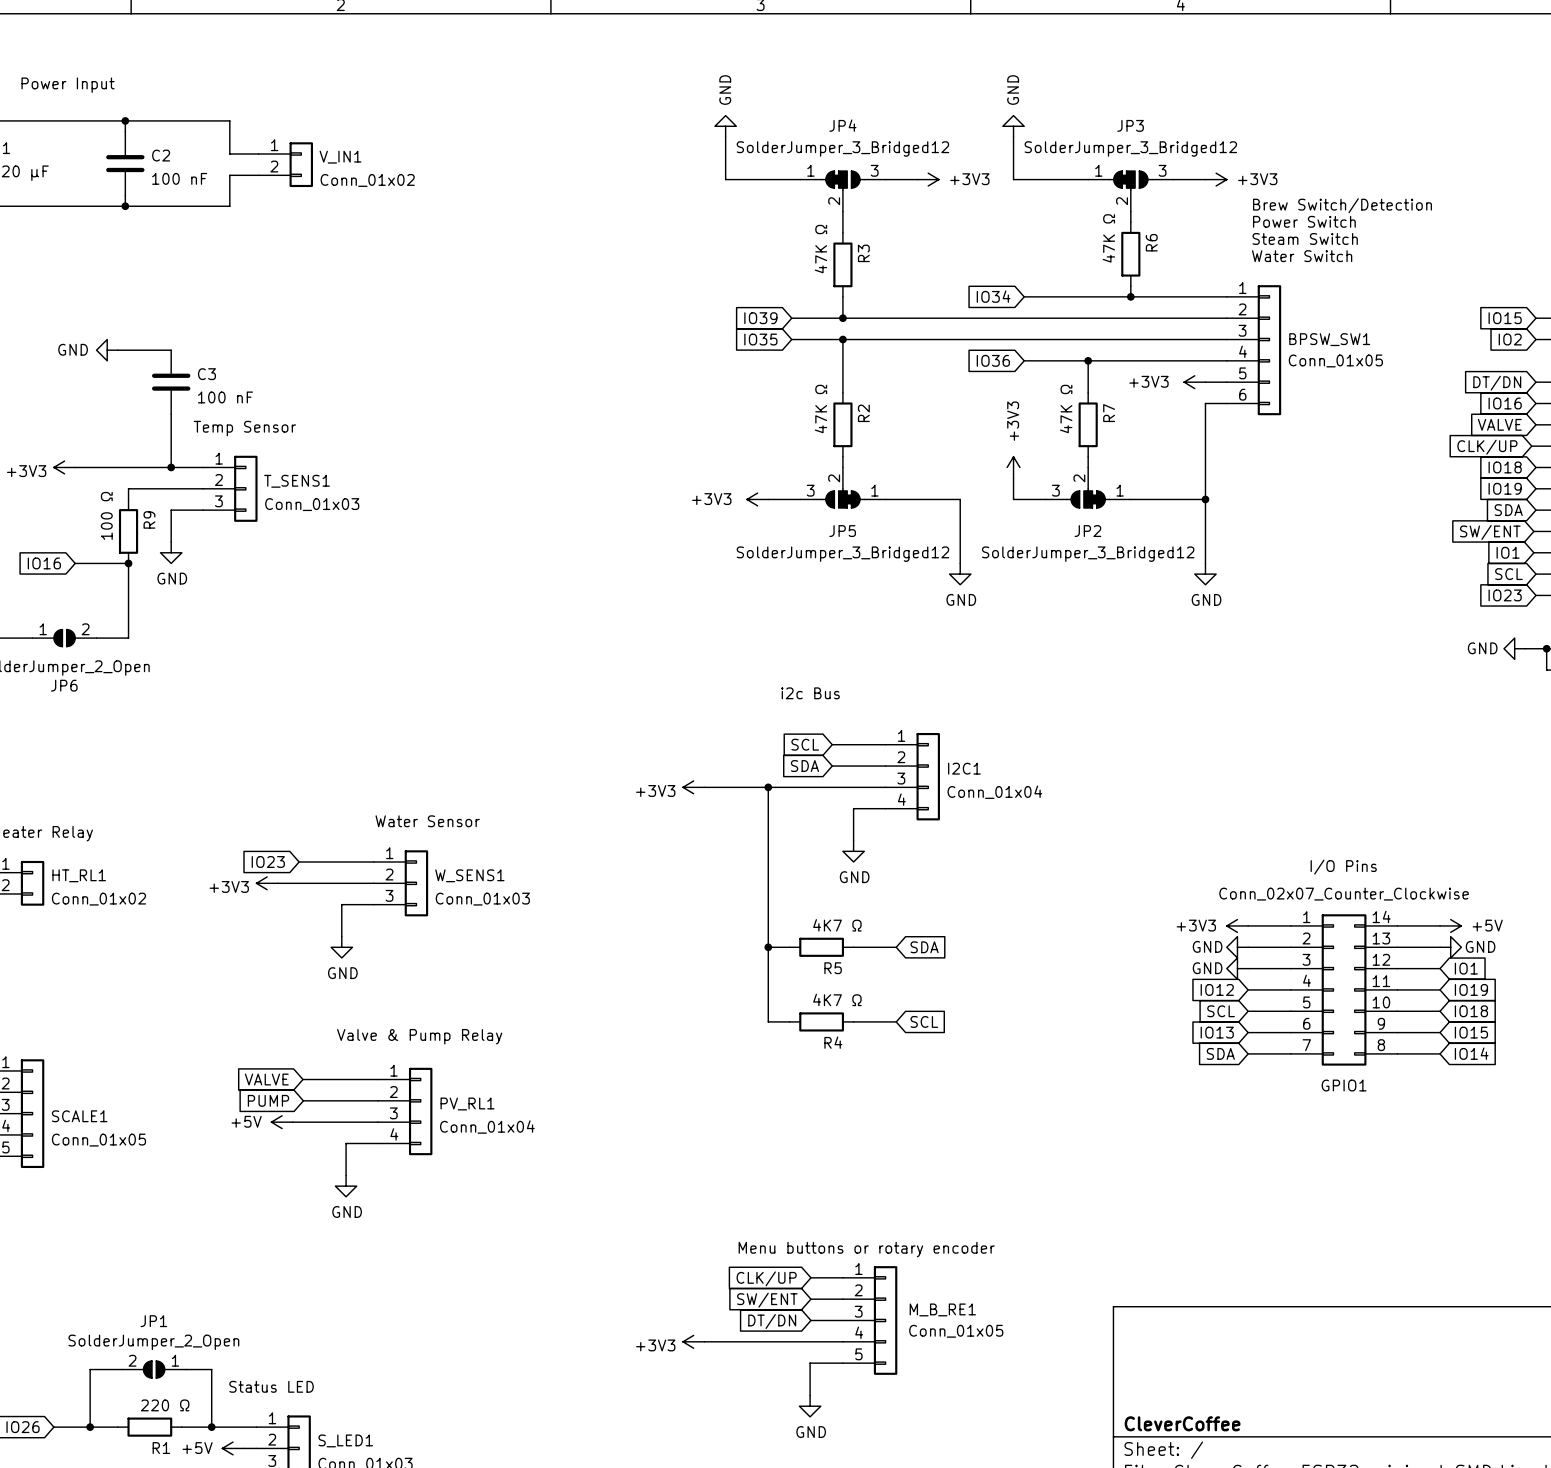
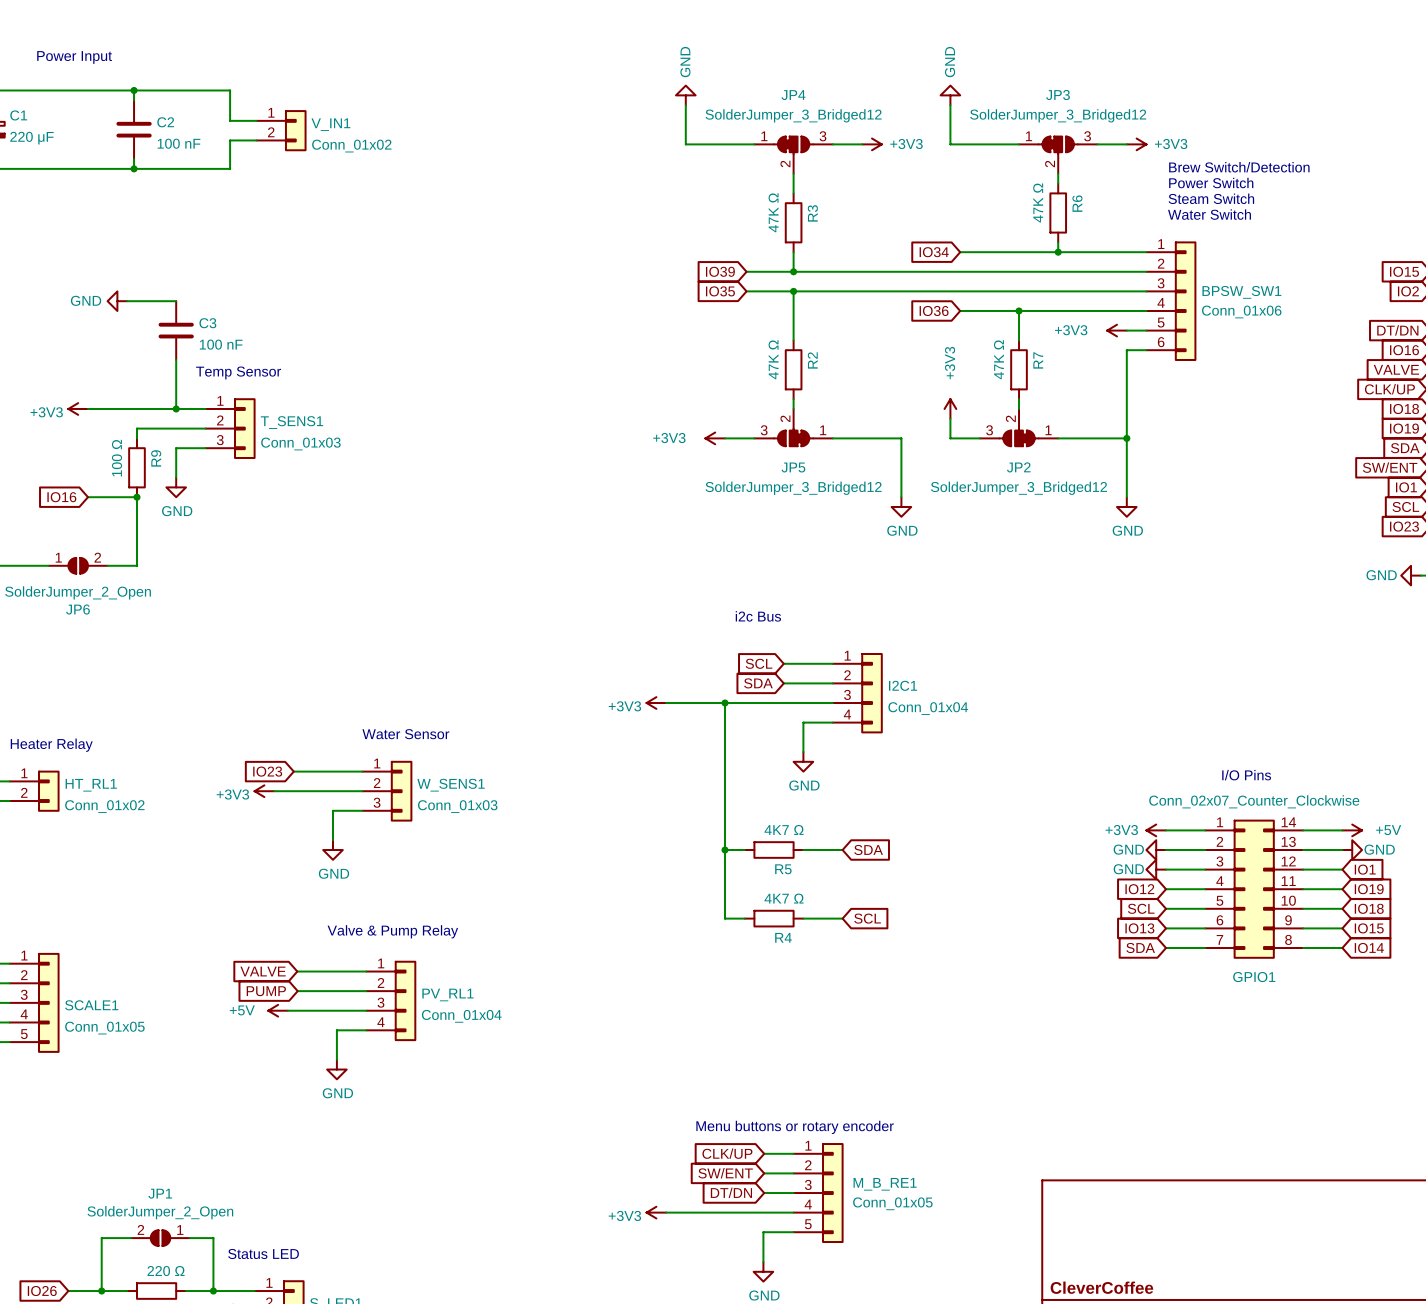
BPSW_SW1 value: Conn_01x05 (1335, 360) -> Conn_01x06 (1241, 311)

